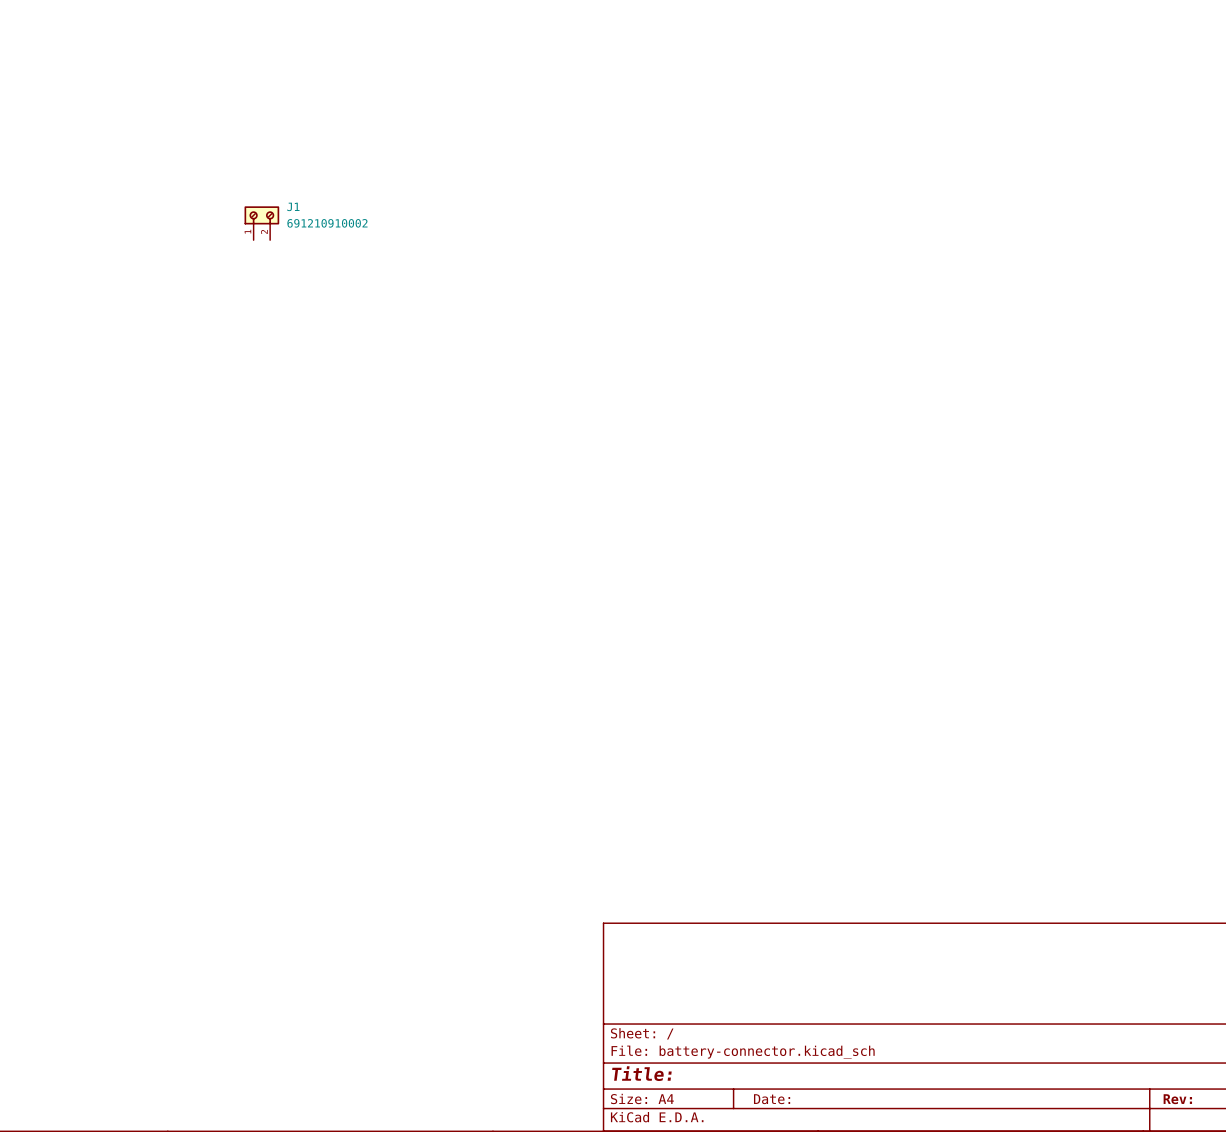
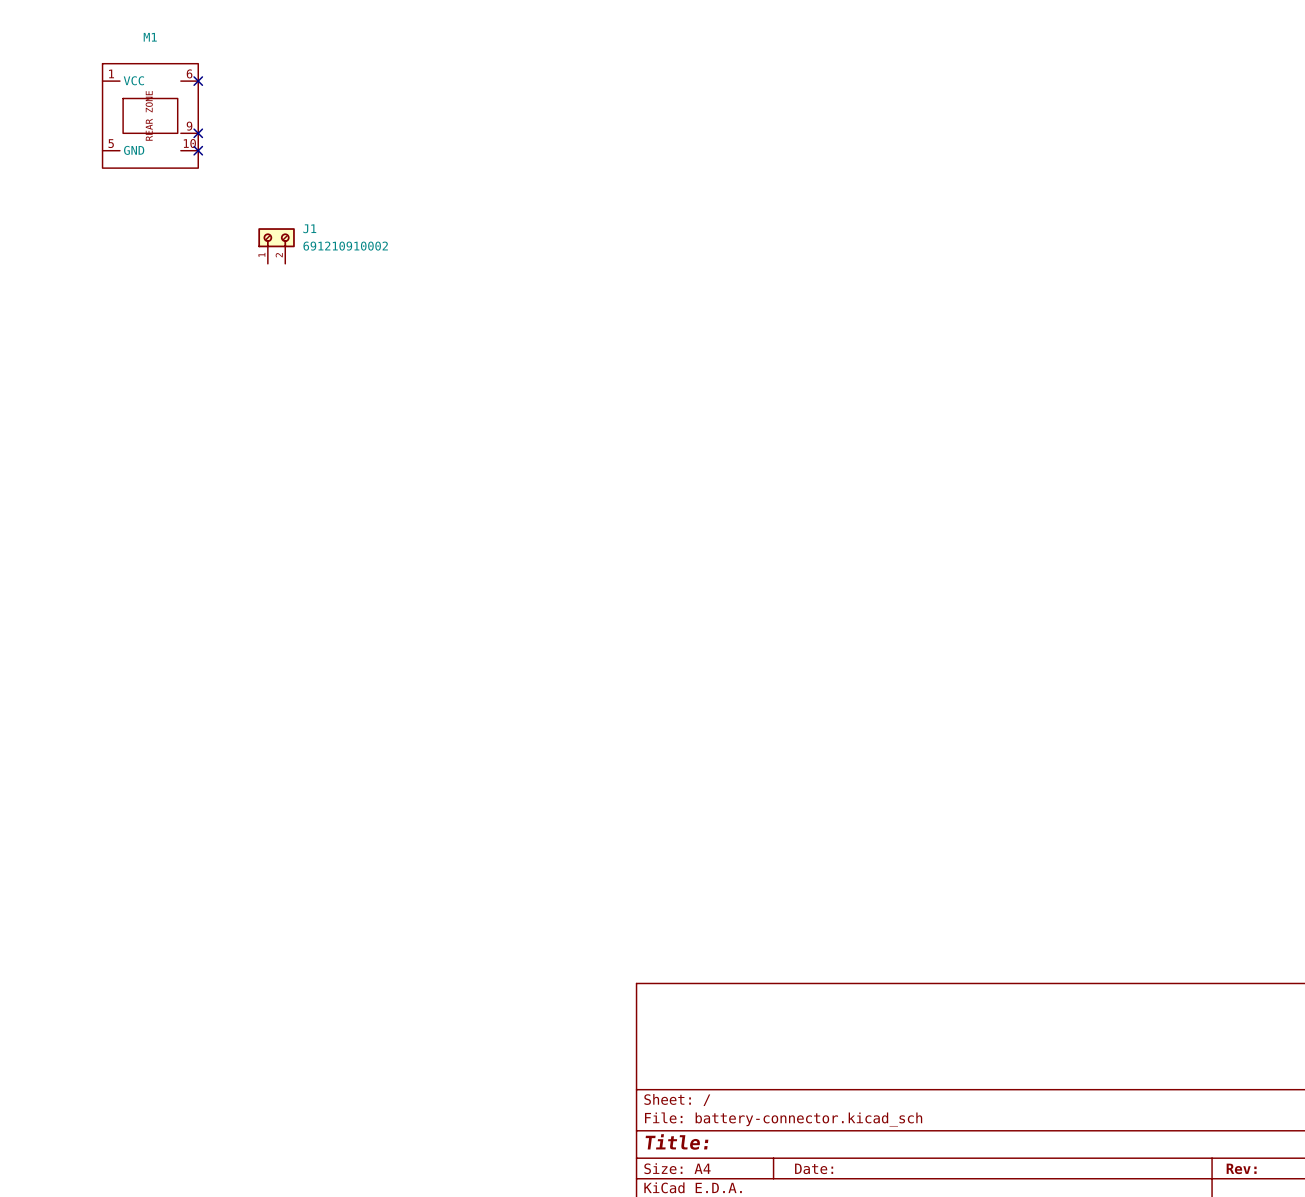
no-connect mark: none -> (198, 81)
M1: none -> (150, 115)
no-connect mark: none -> (198, 133)
no-connect mark: none -> (198, 150)

